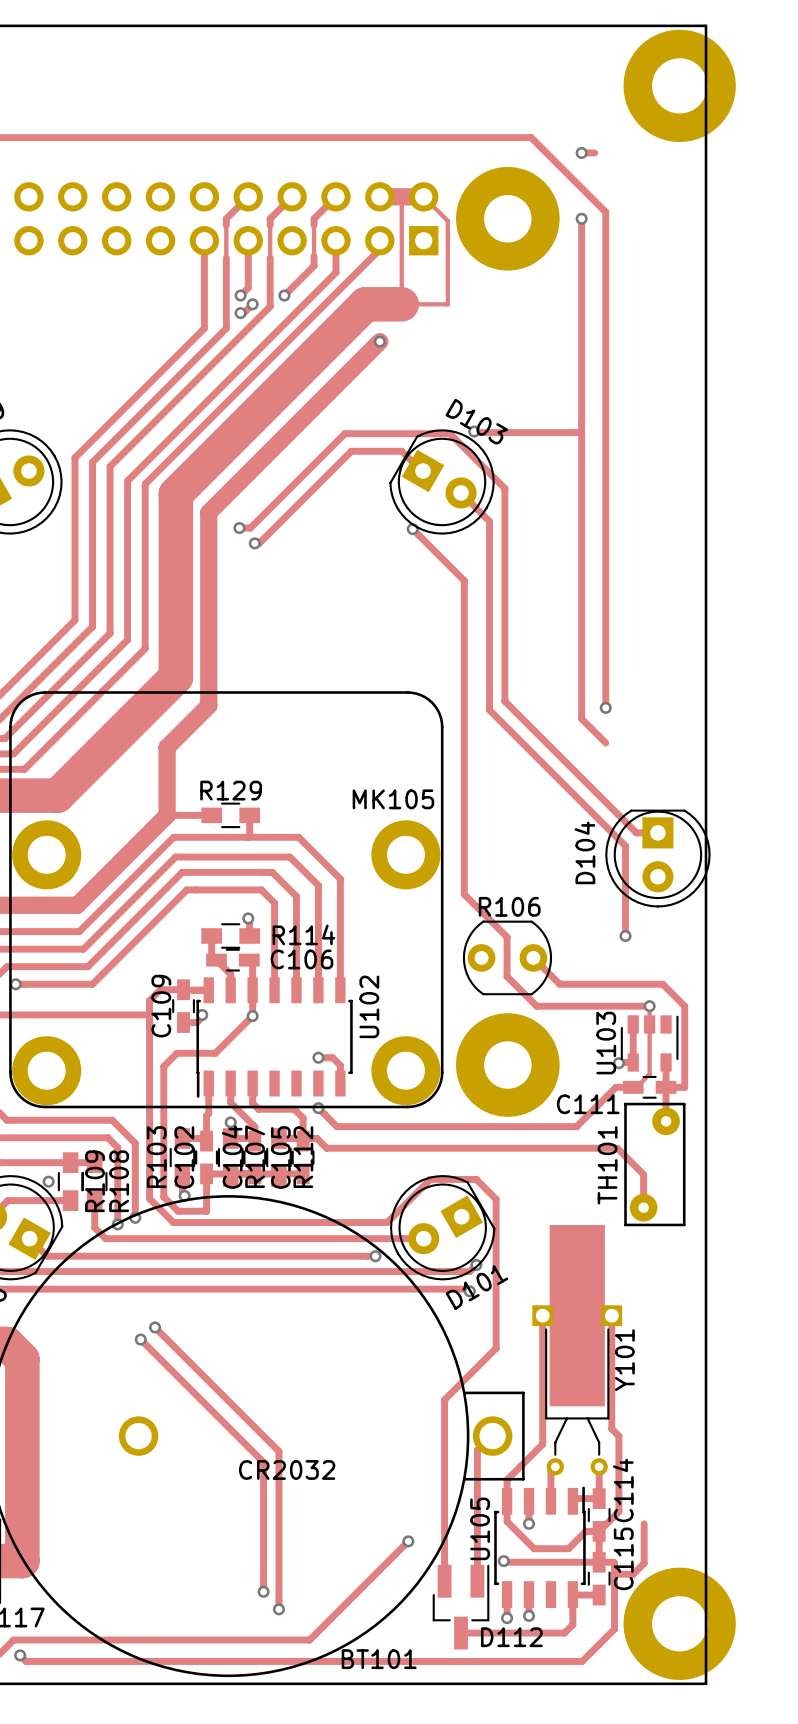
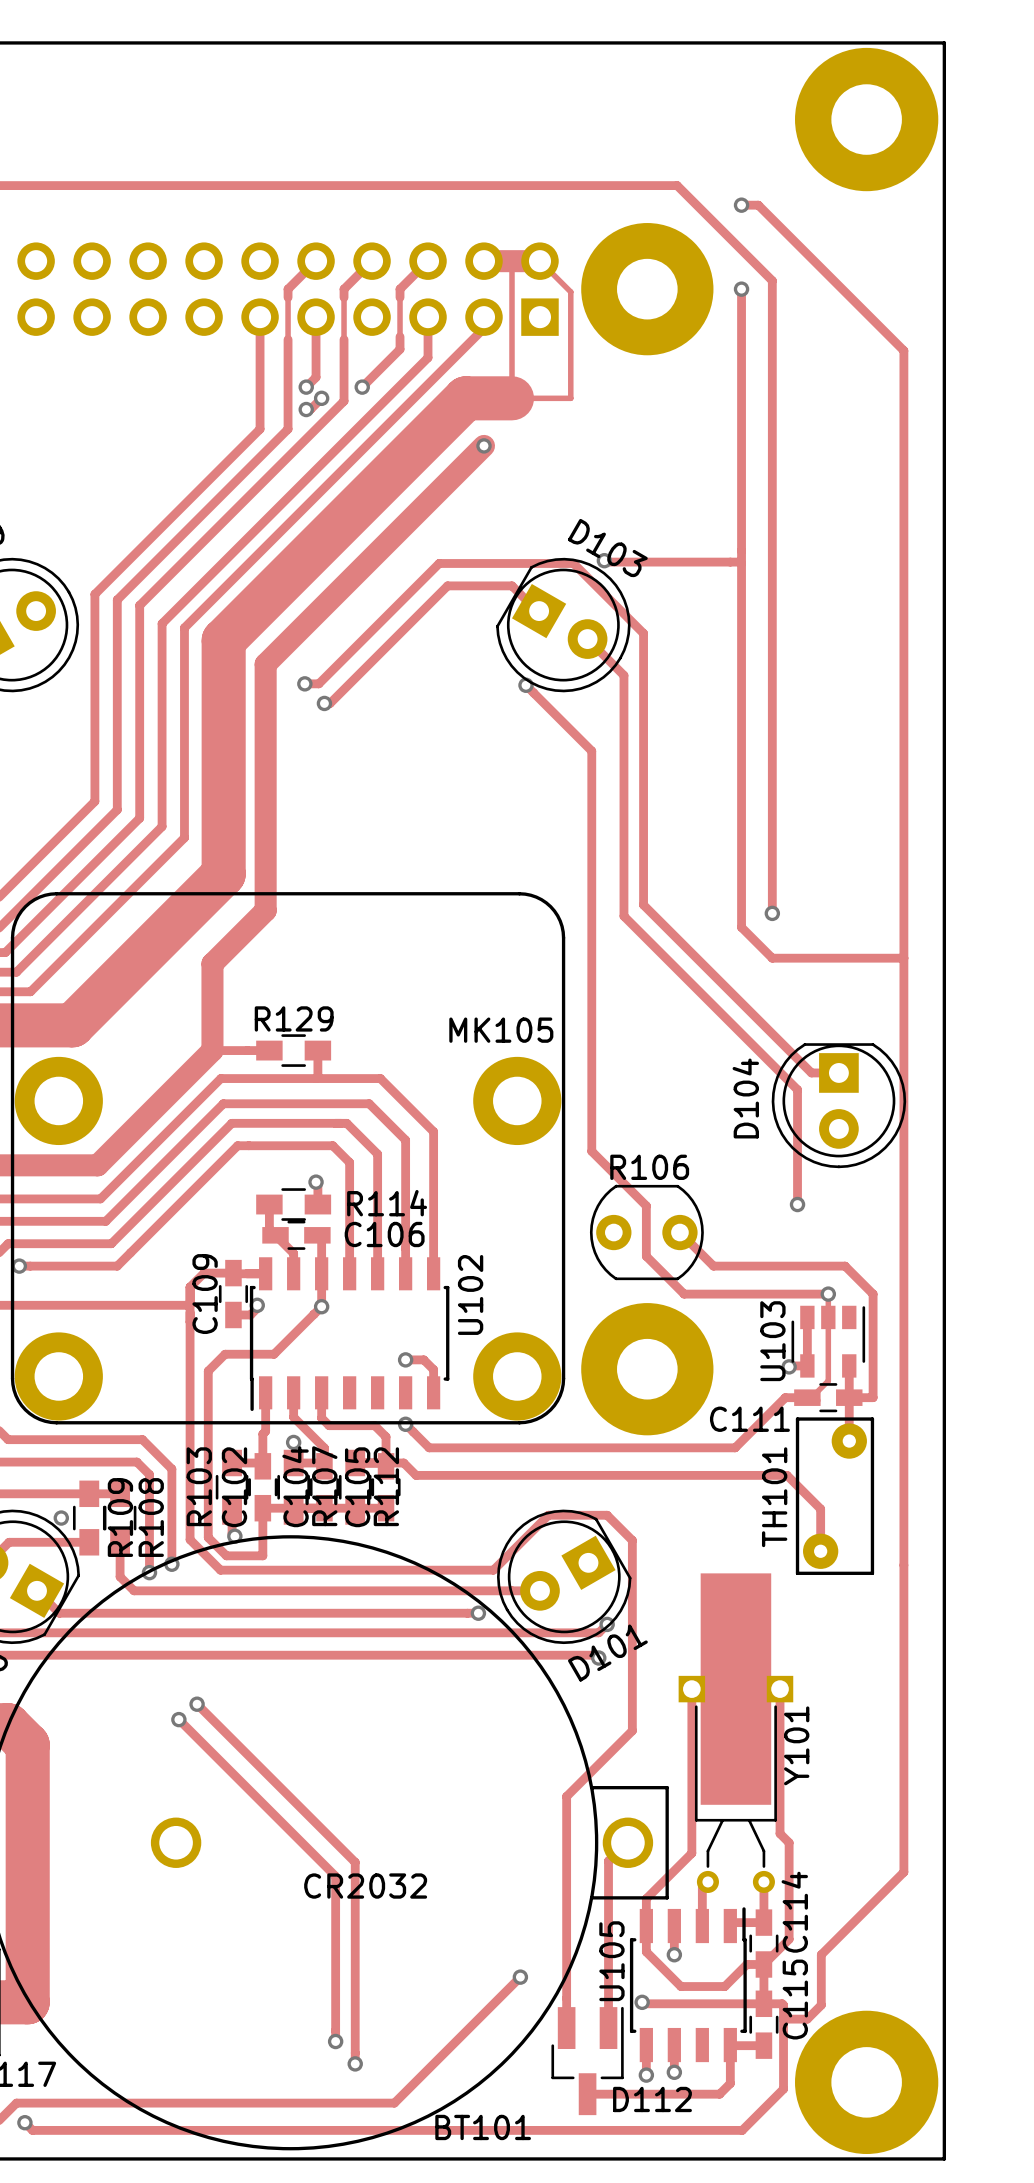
board edge: (706, 25) (706, 1683) -> (900, 42) (944, 42) (944, 2158) (900, 2158)
track: none -> (758, 205) (903, 350) (903, 1872) (821, 1954)
track: none -> (772, 958) (903, 958)

